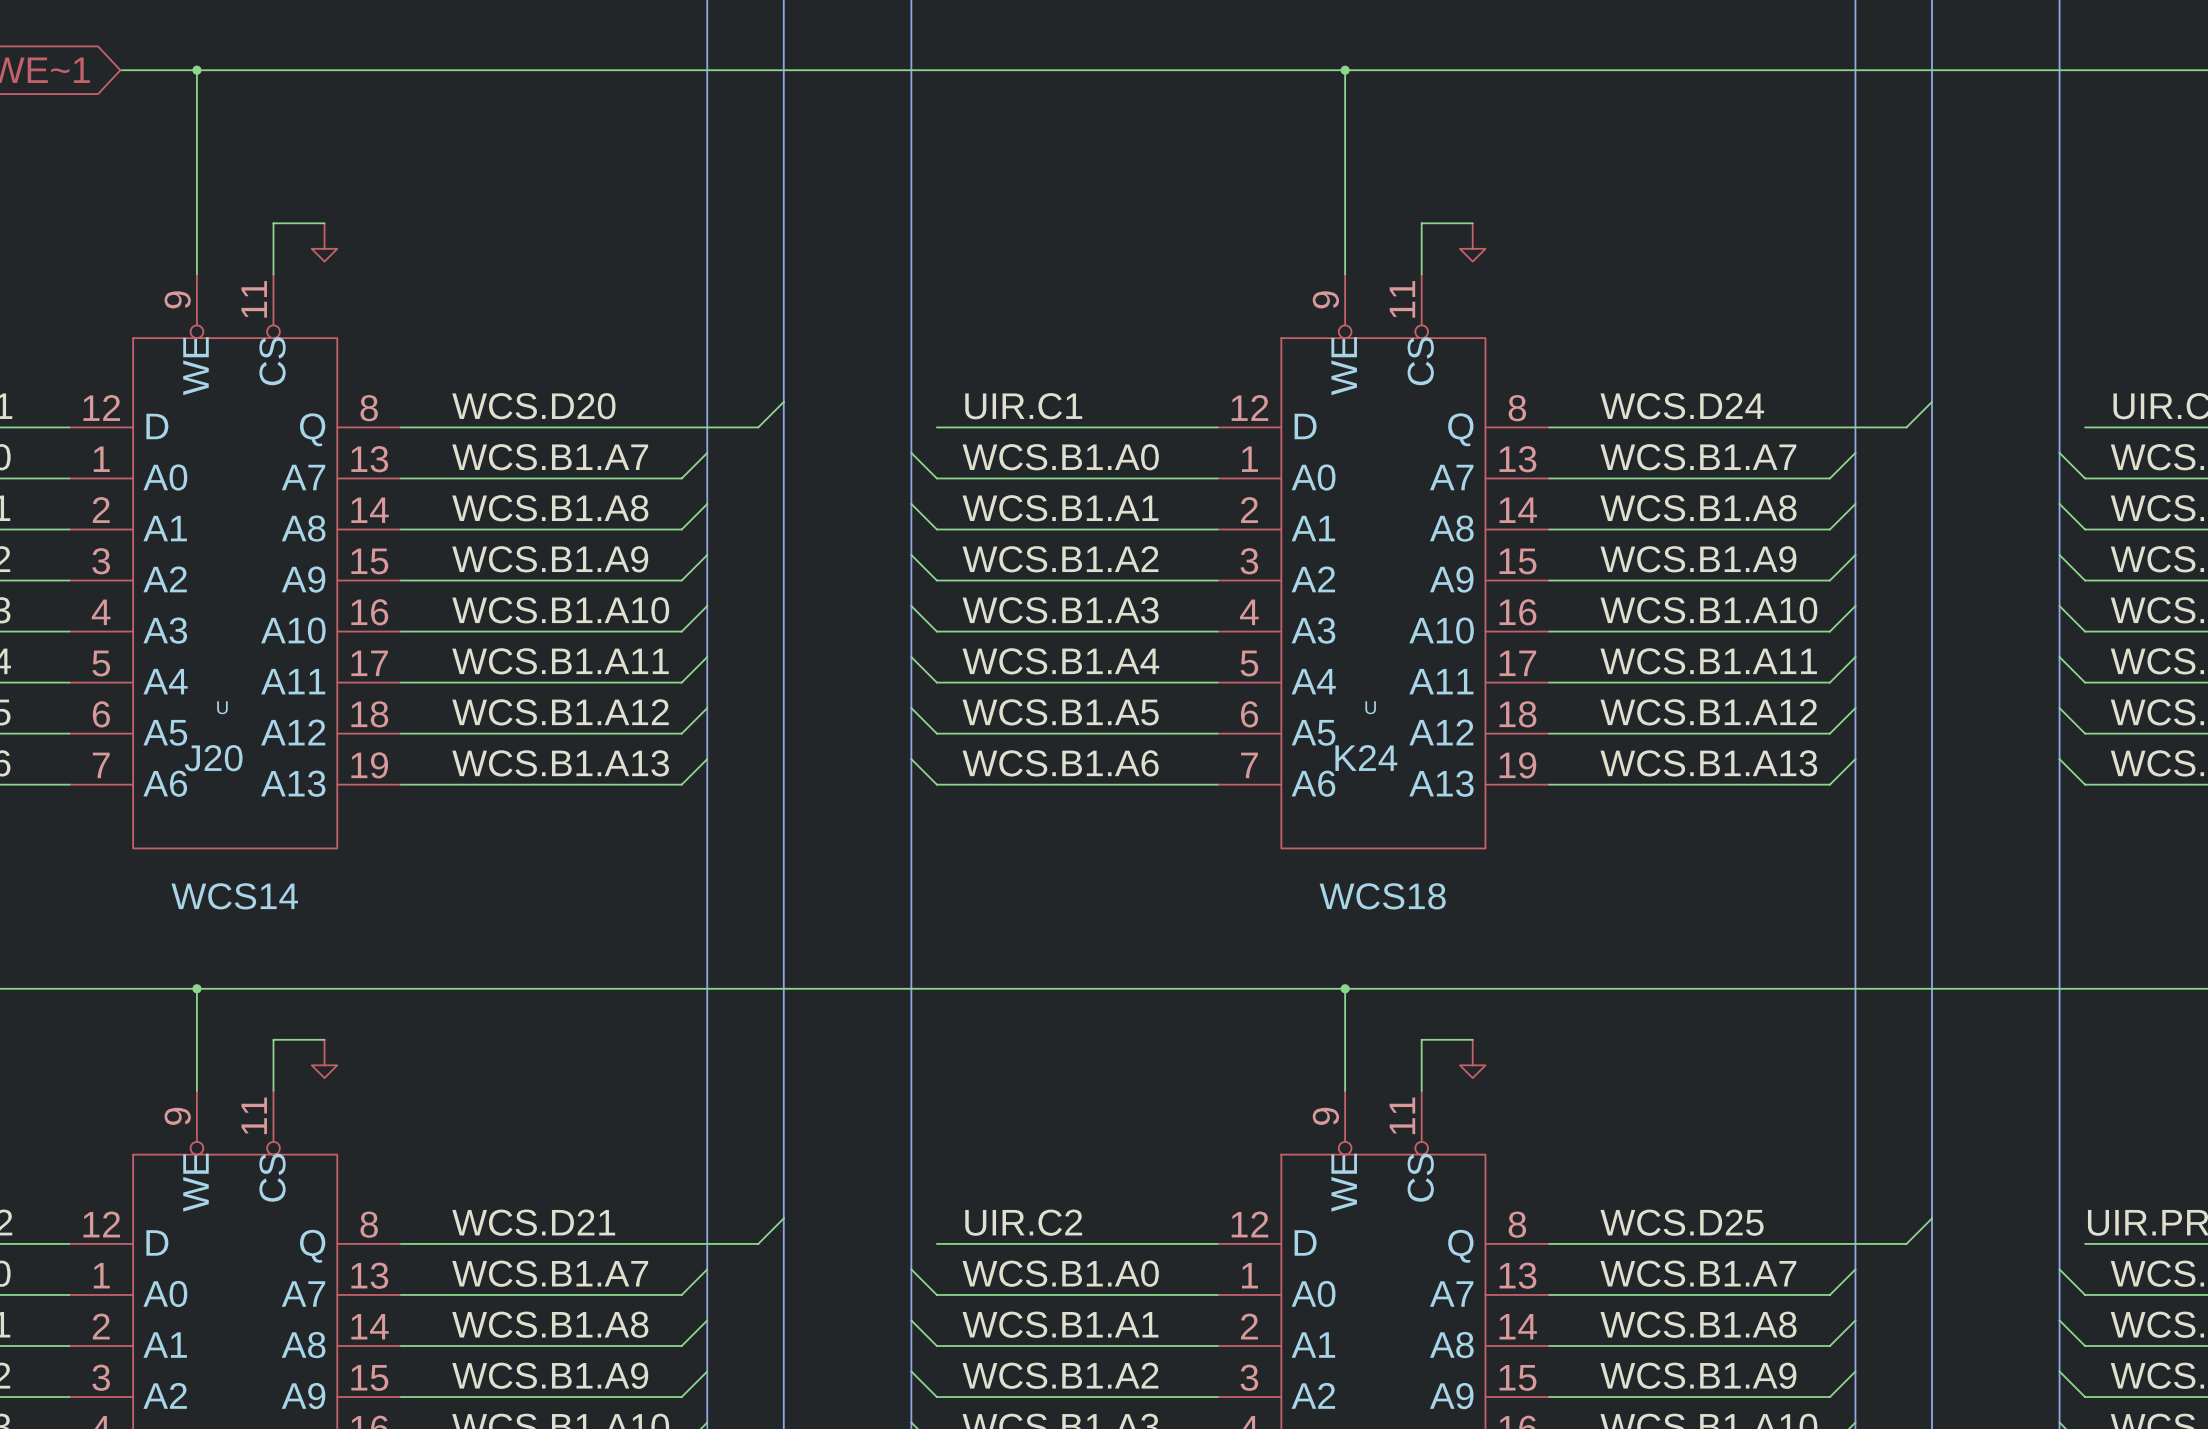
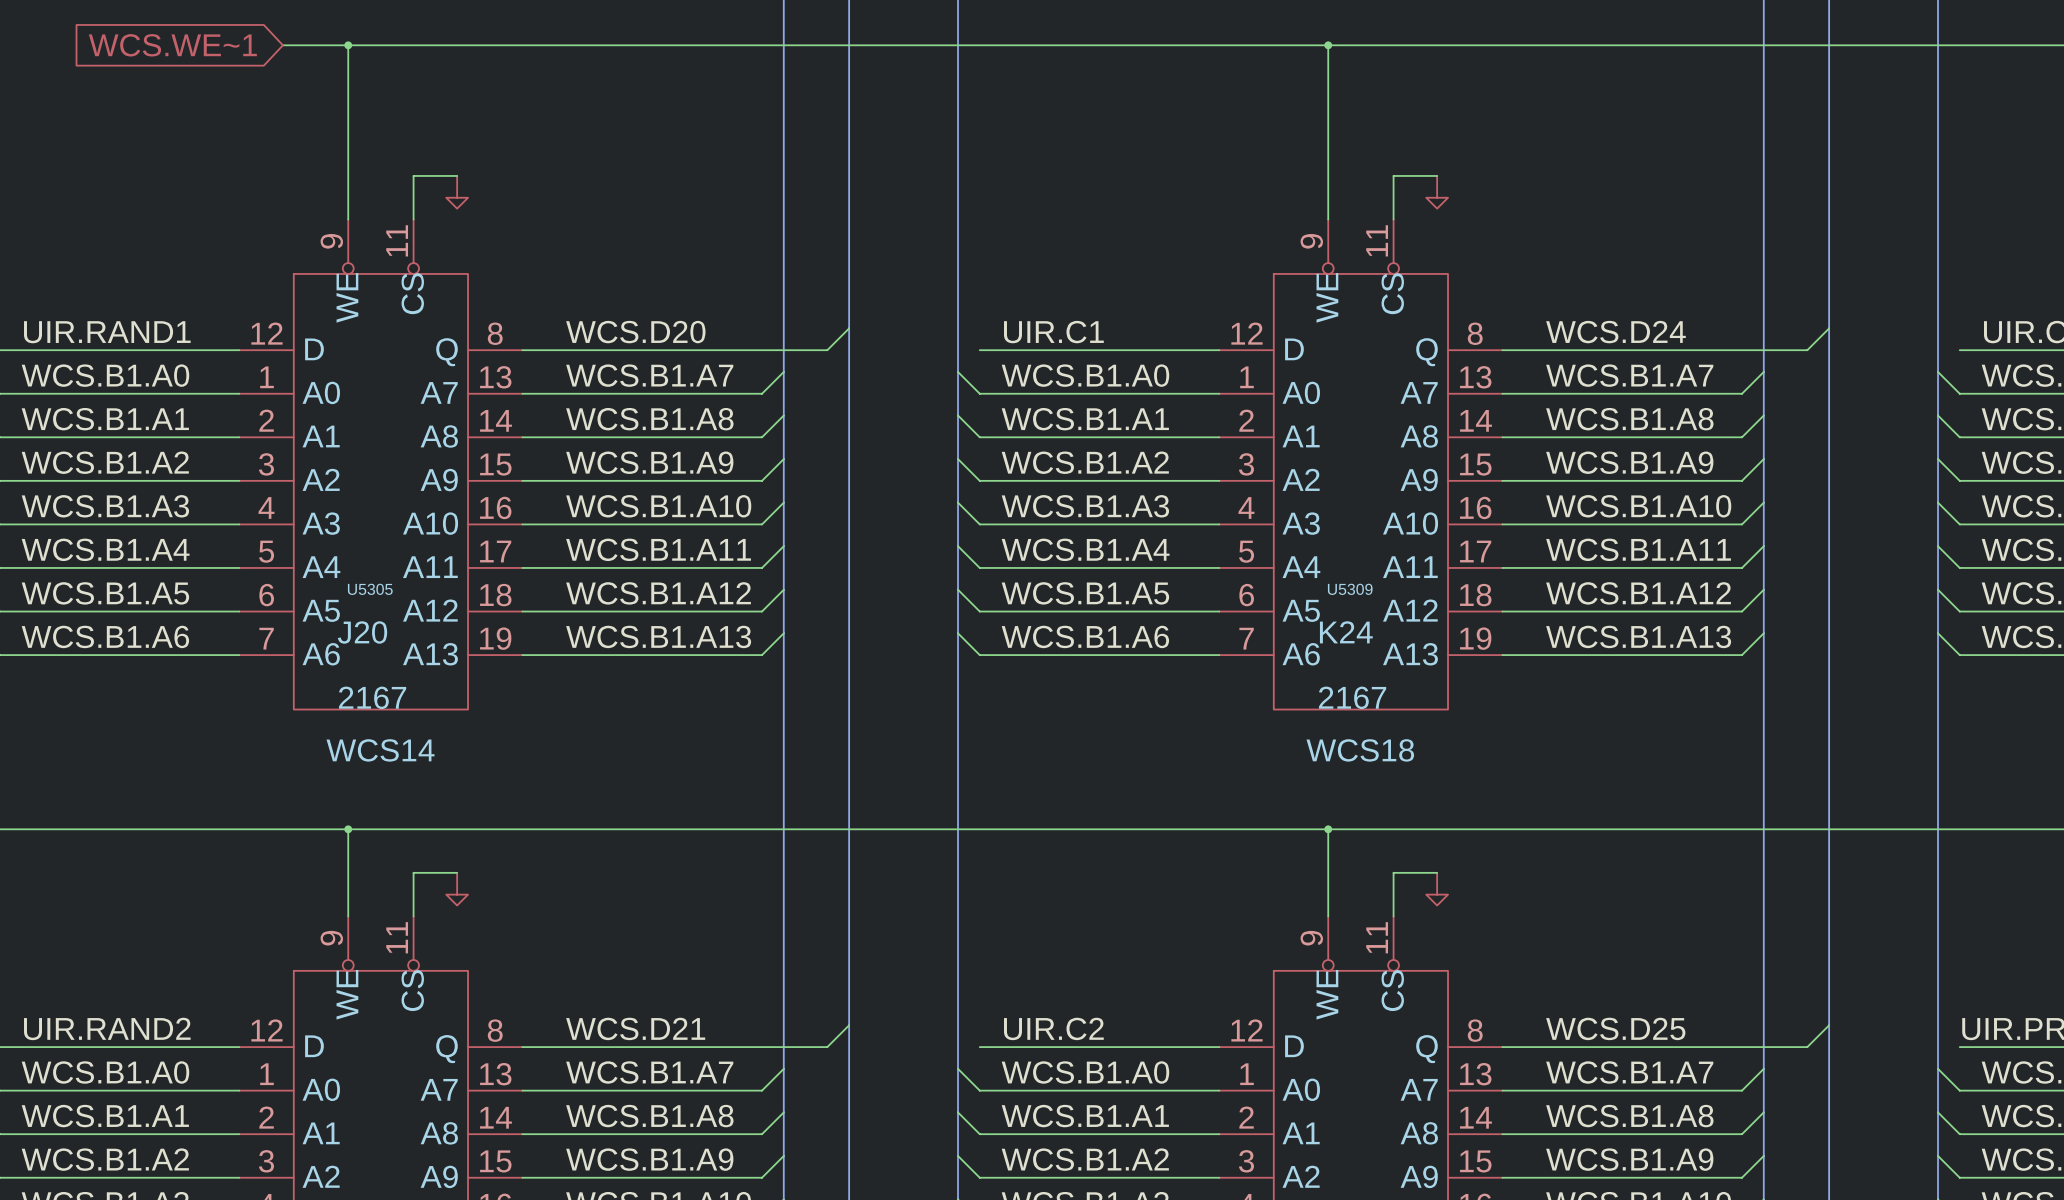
U name: U (222, 707) -> U5305 (370, 589)
U name: U (1370, 707) -> U5309 (1350, 589)
U value: none -> 2167 (372, 697)
U value: none -> 2167 (1352, 697)

